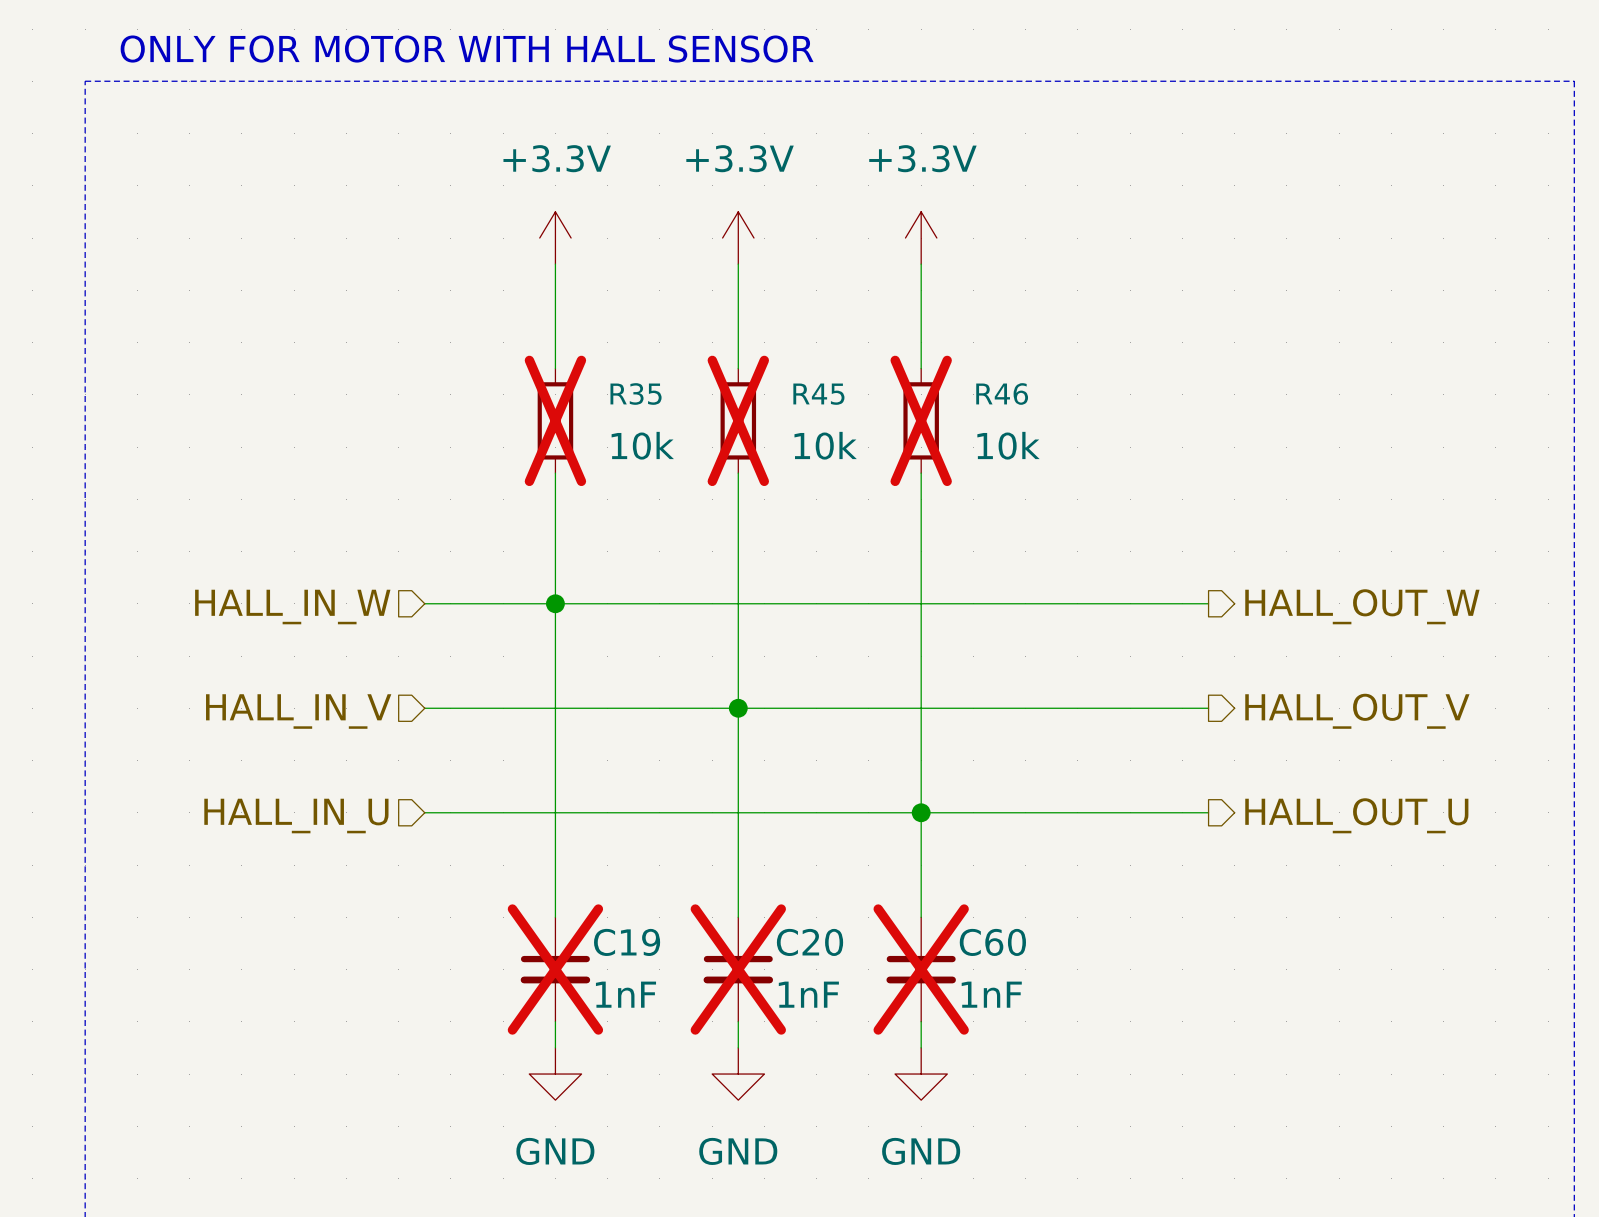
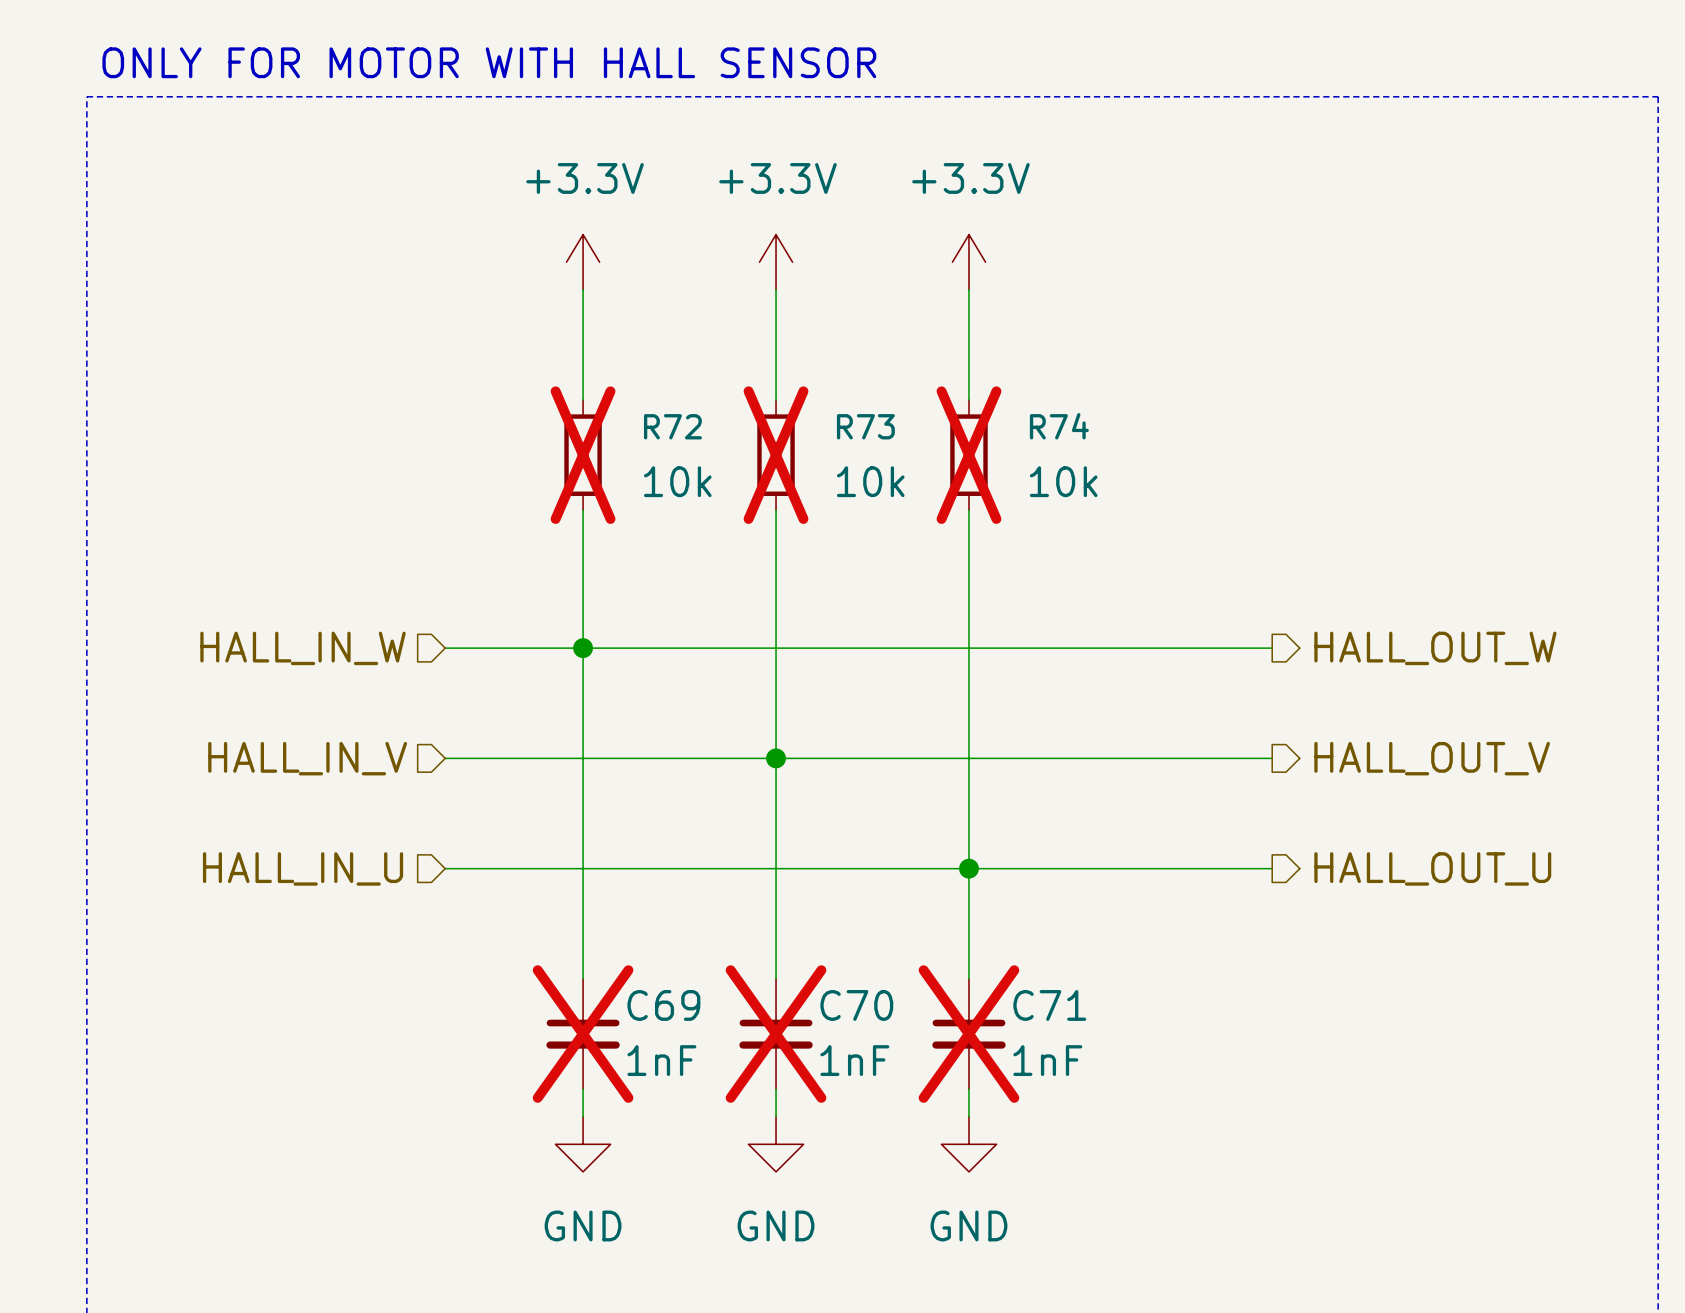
R35 name: R35 (636, 393) -> R72 (672, 426)
R46 name: R46 (1002, 393) -> R74 (1059, 426)
R45 name: R45 (818, 394) -> R73 (865, 426)
C19 name: C19 (627, 942) -> C69 (663, 1005)
C20 name: C20 (810, 942) -> C70 (856, 1005)
C60 name: C60 (992, 942) -> C71 (1049, 1005)

